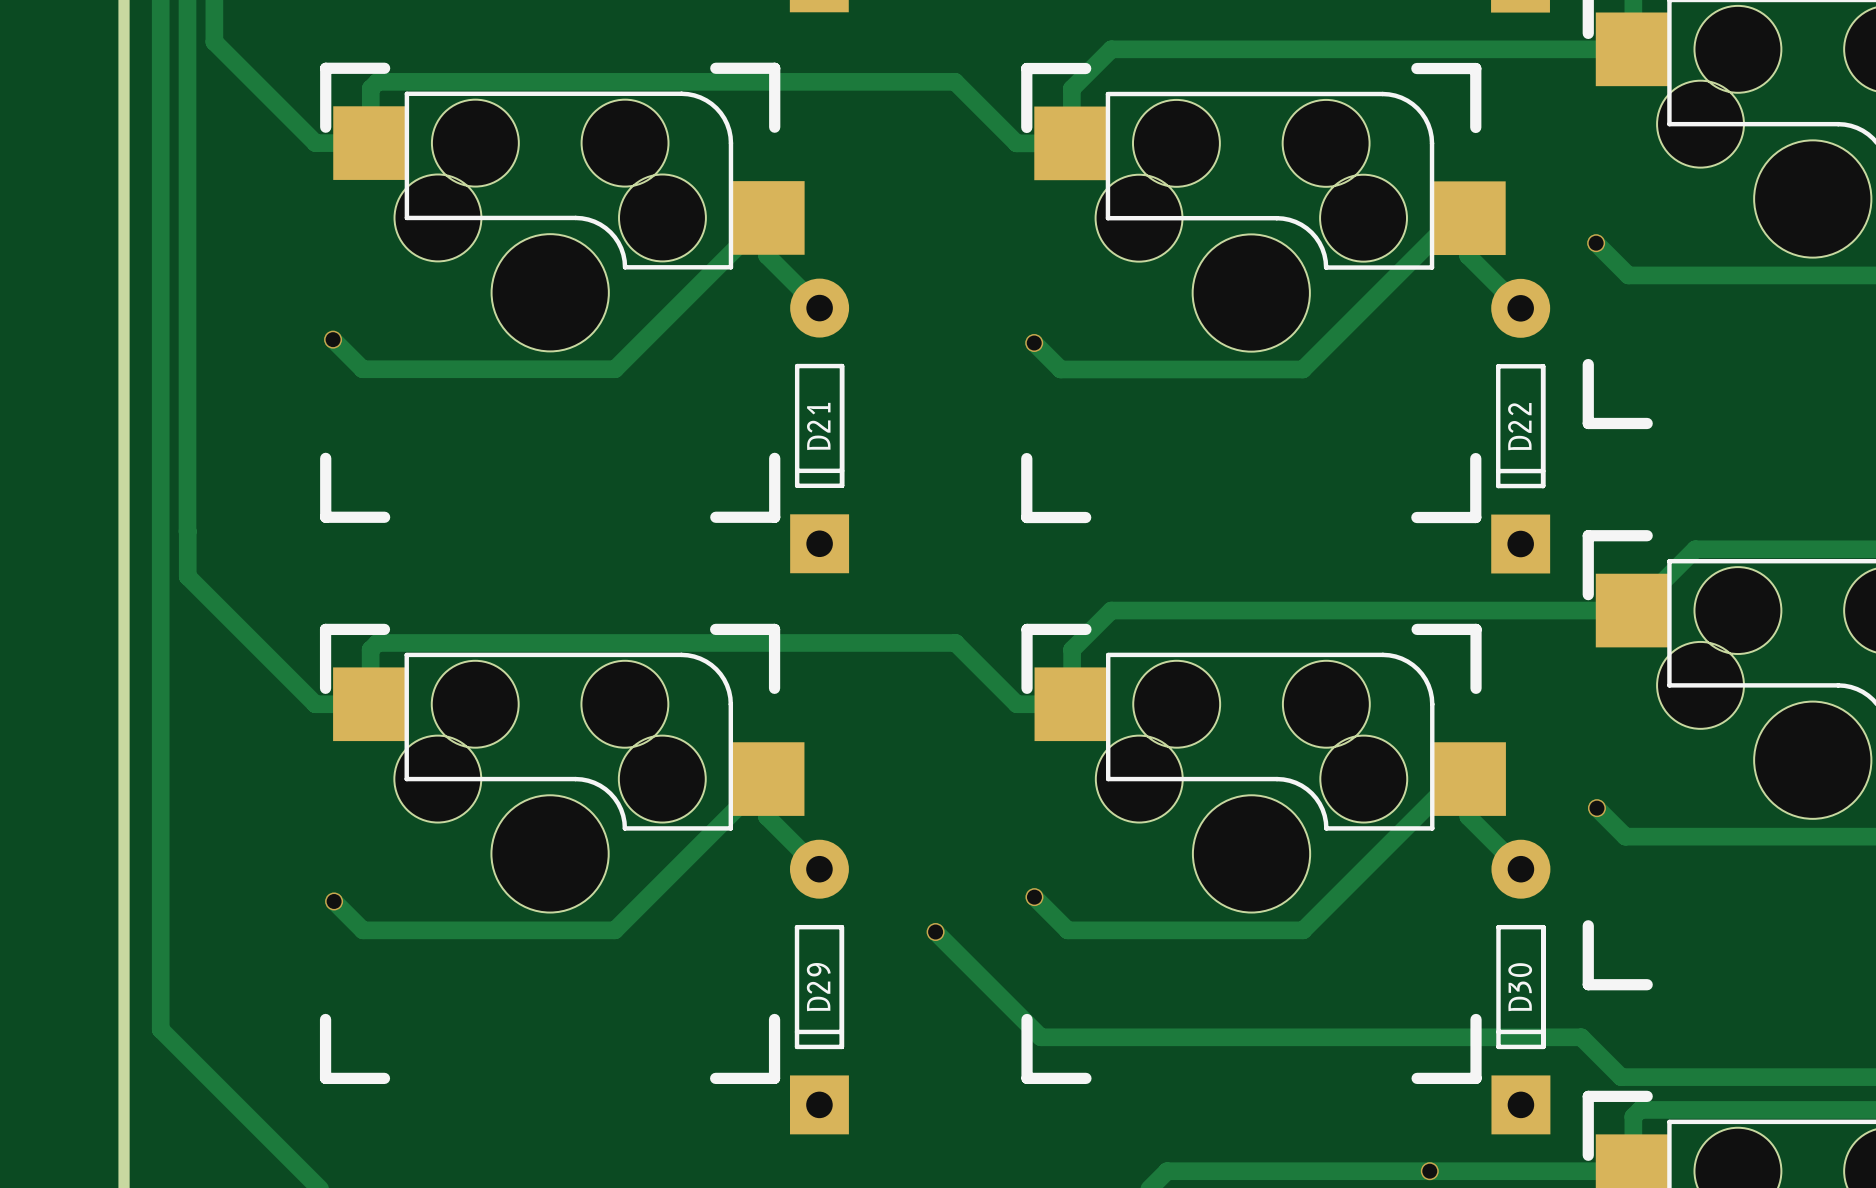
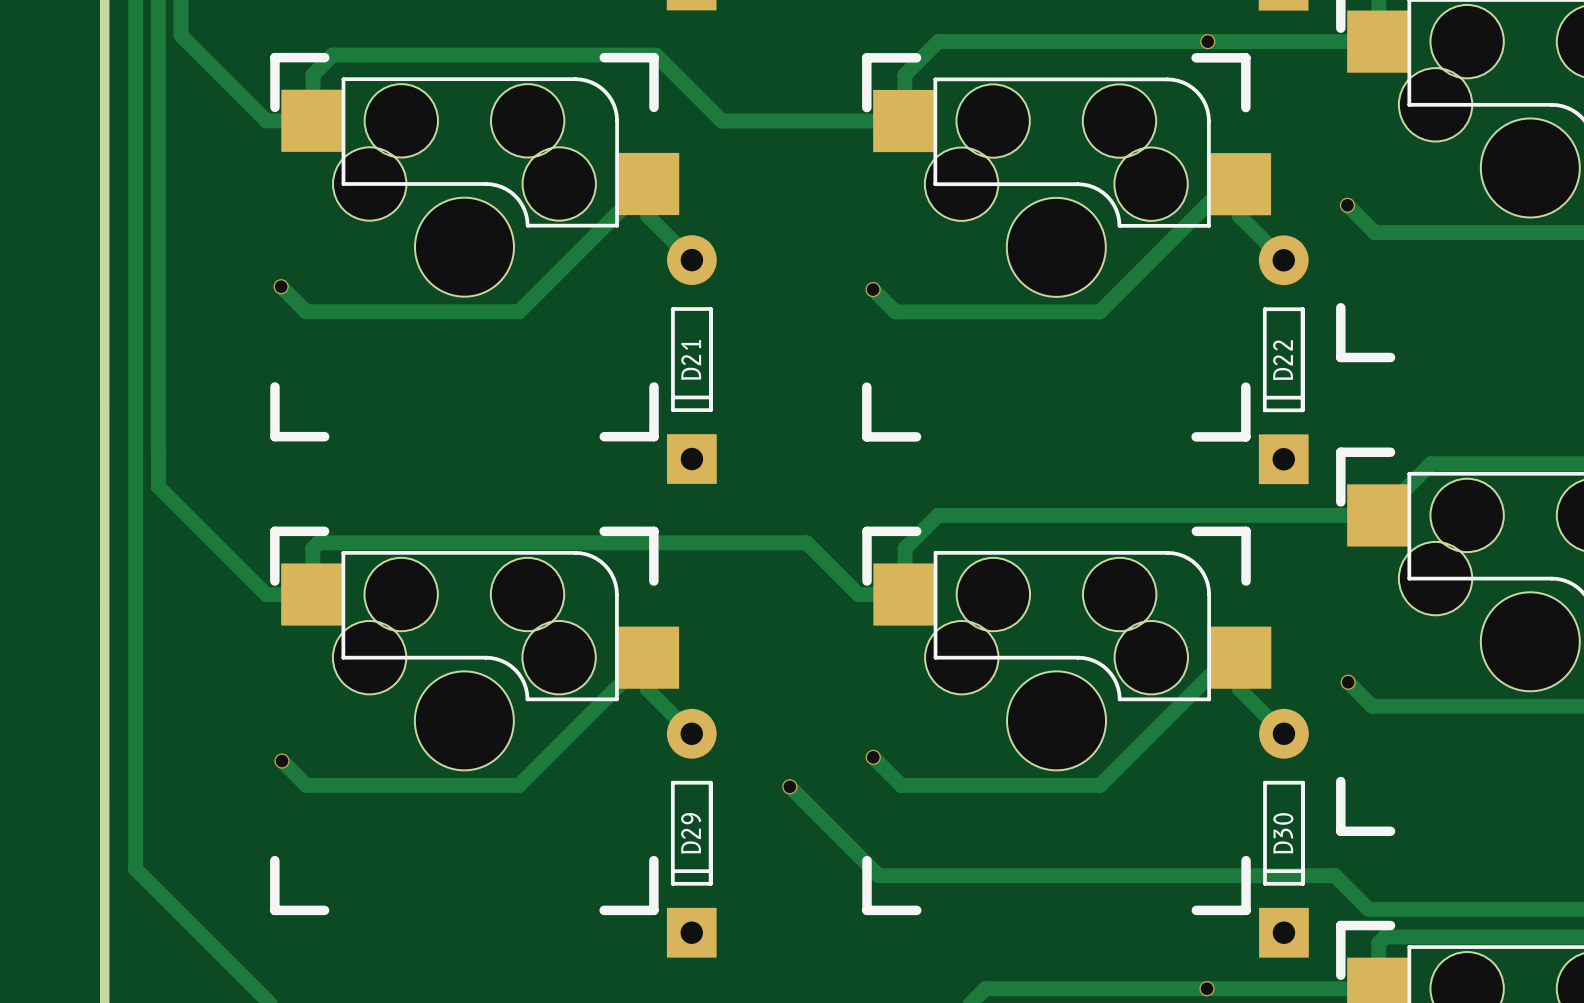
via: none -> (1207, 41)
track: (377, 81) (955, 81) (1016, 143) -> (318, 69) (332, 55) (655, 55) (721, 121) (858, 121)

